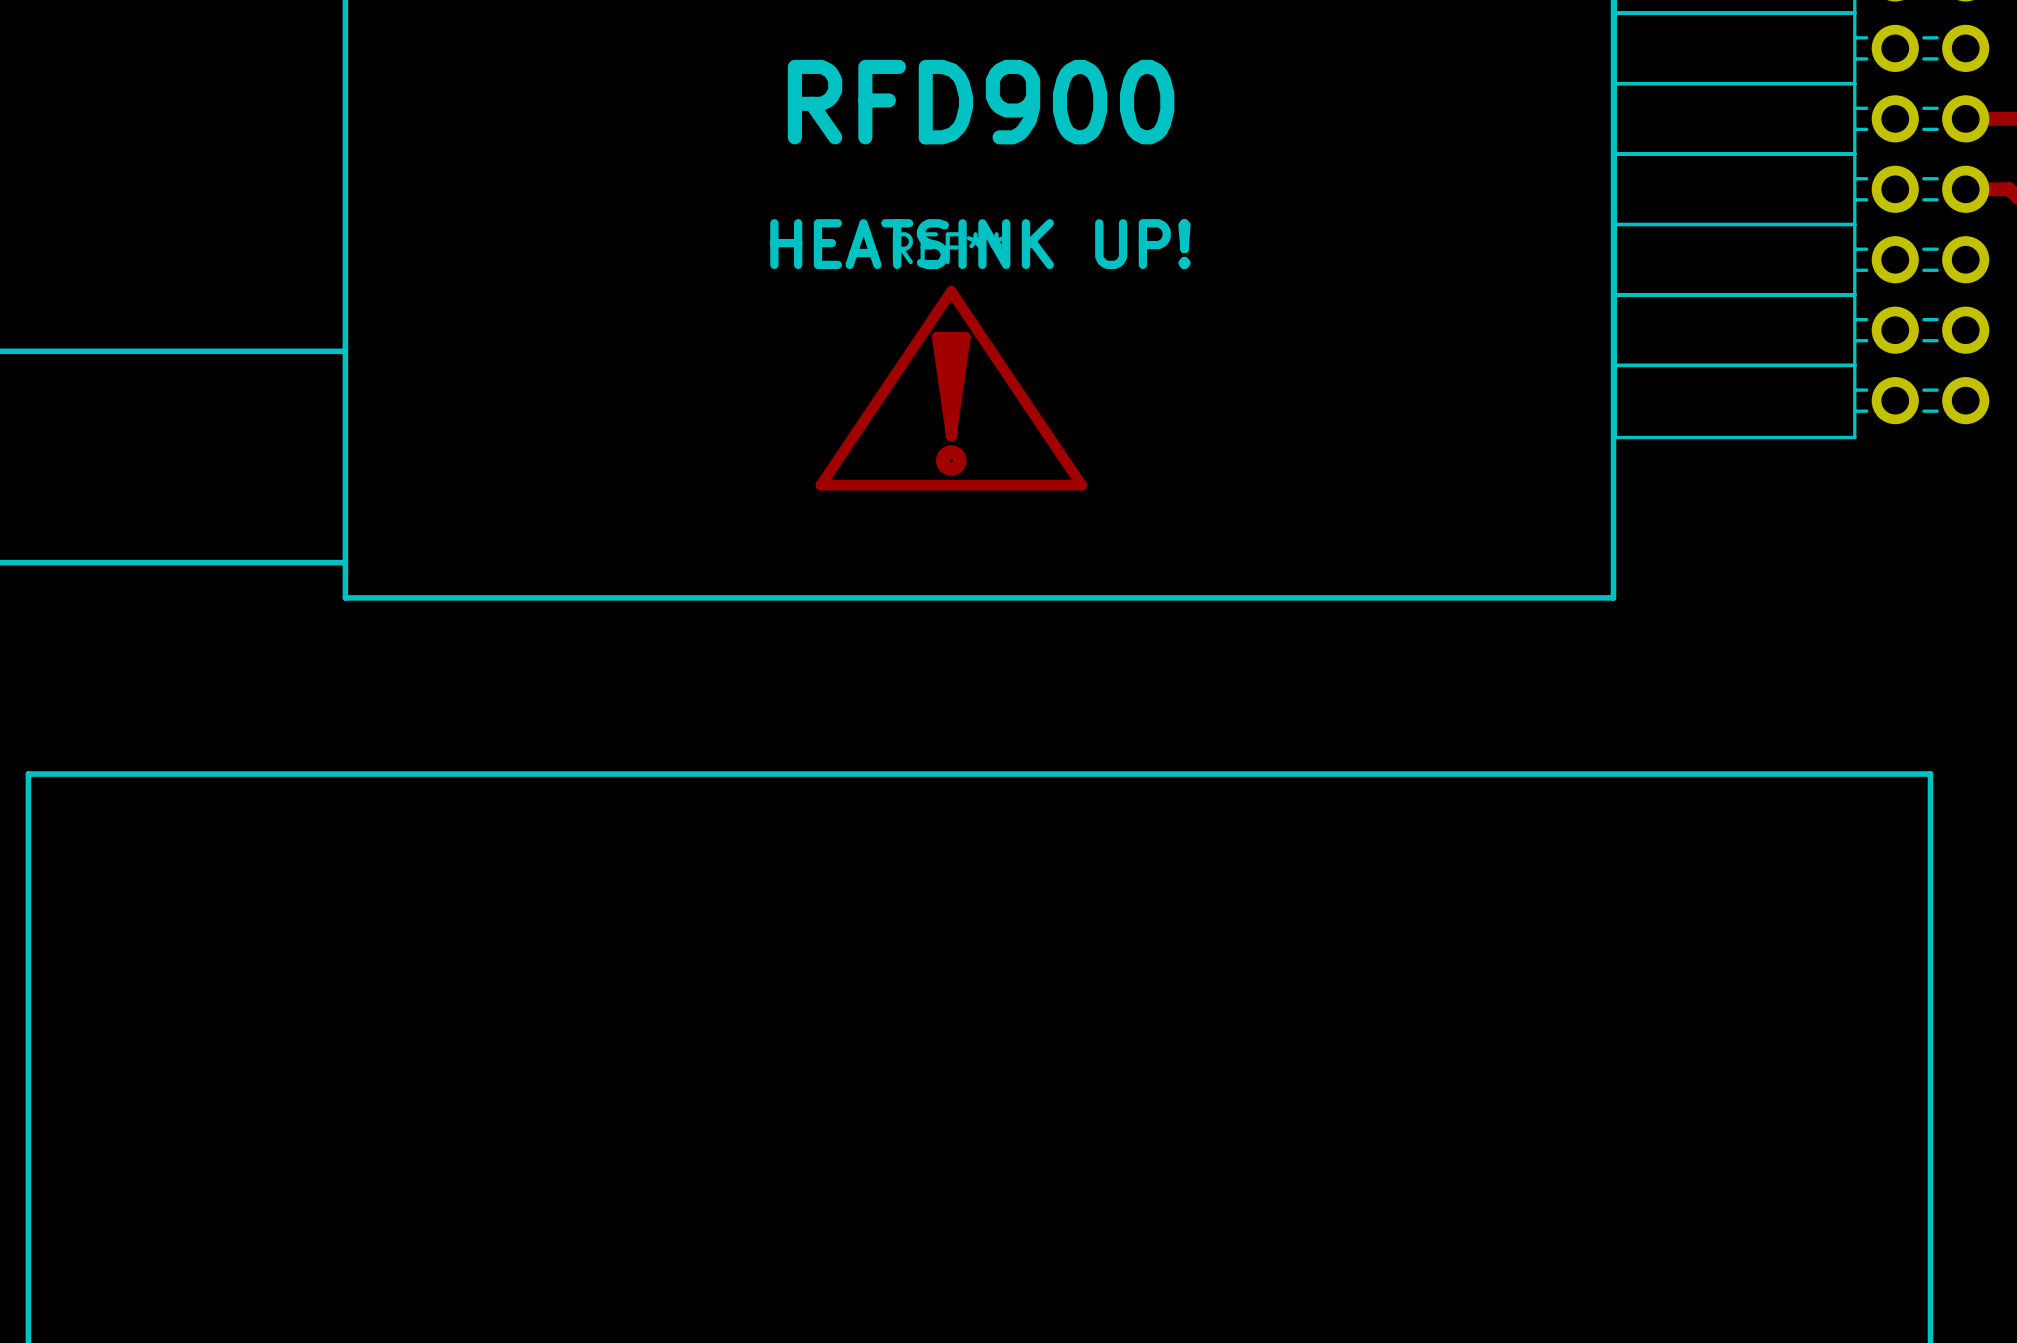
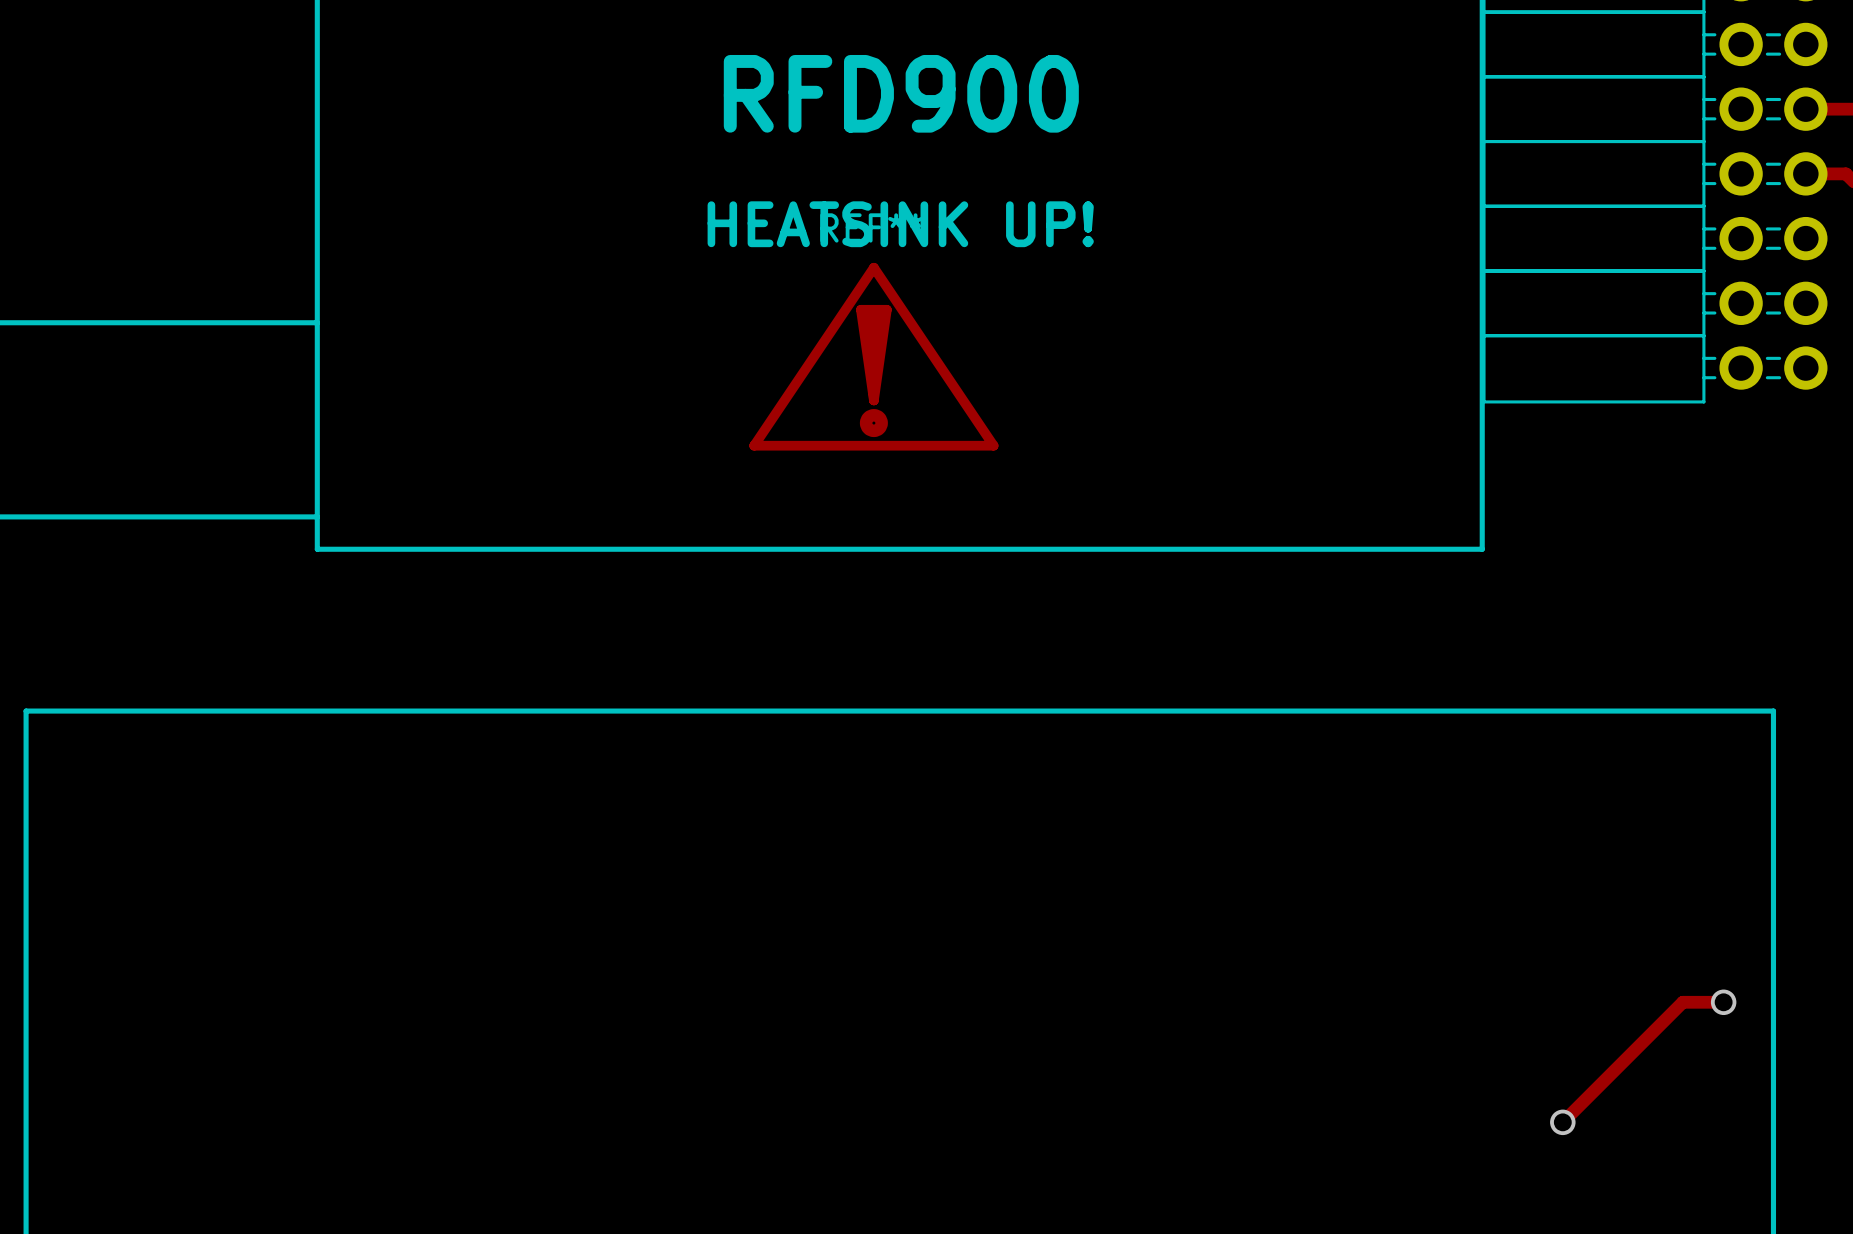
track: none -> (1723, 1002) (1682, 1002) (1562, 1122)
via: none -> (1723, 1002)
via: none -> (1562, 1122)

